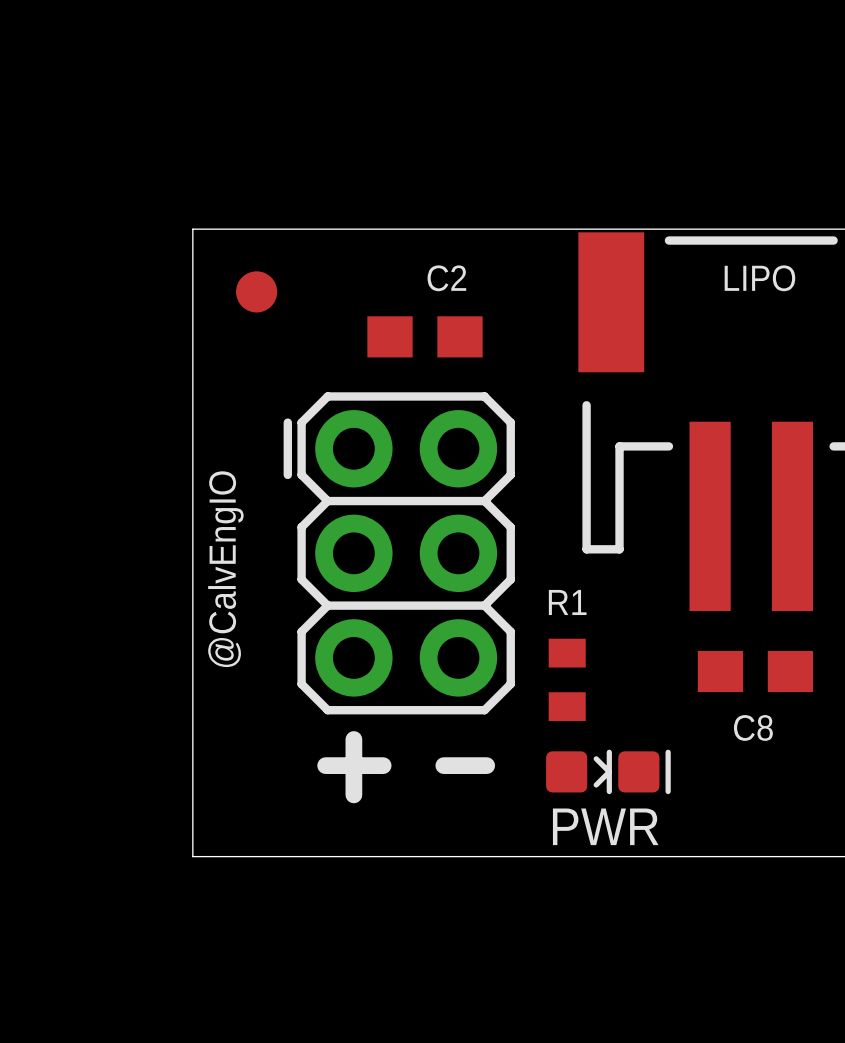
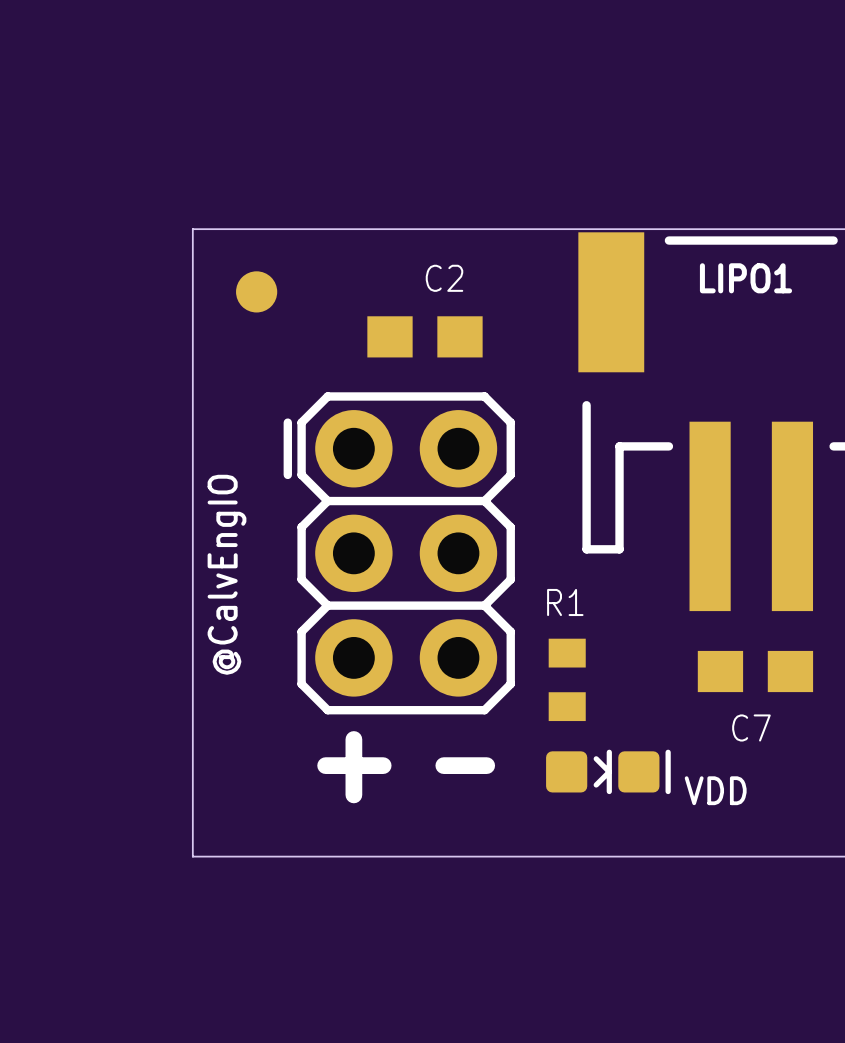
LIPO name: LIPO (759, 278) -> LIPO1 (745, 278)
C8 name: C8 (753, 727) -> C7 (751, 727)
PWR name: PWR (605, 826) -> VDD (715, 790)

